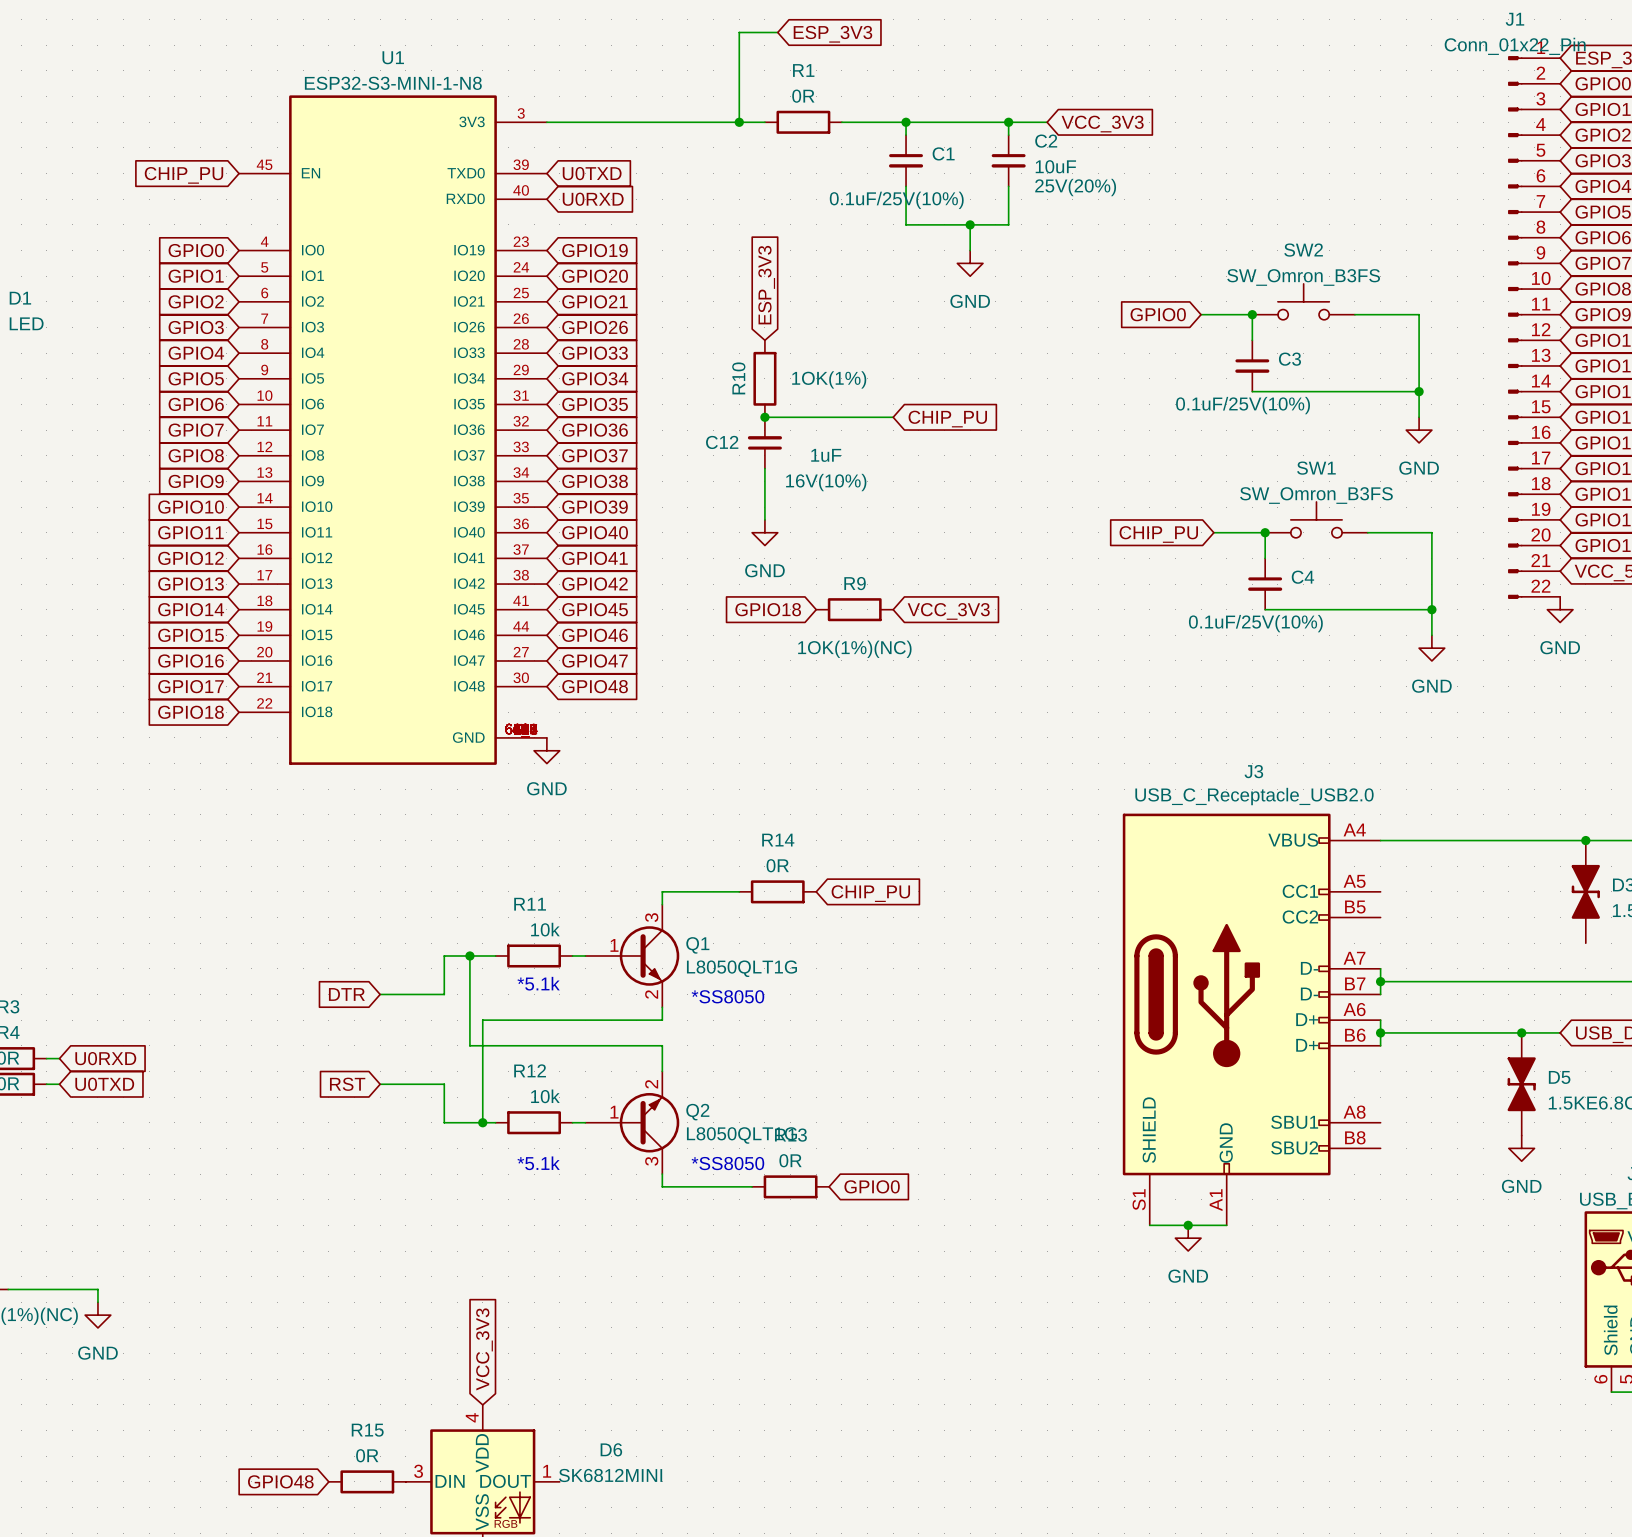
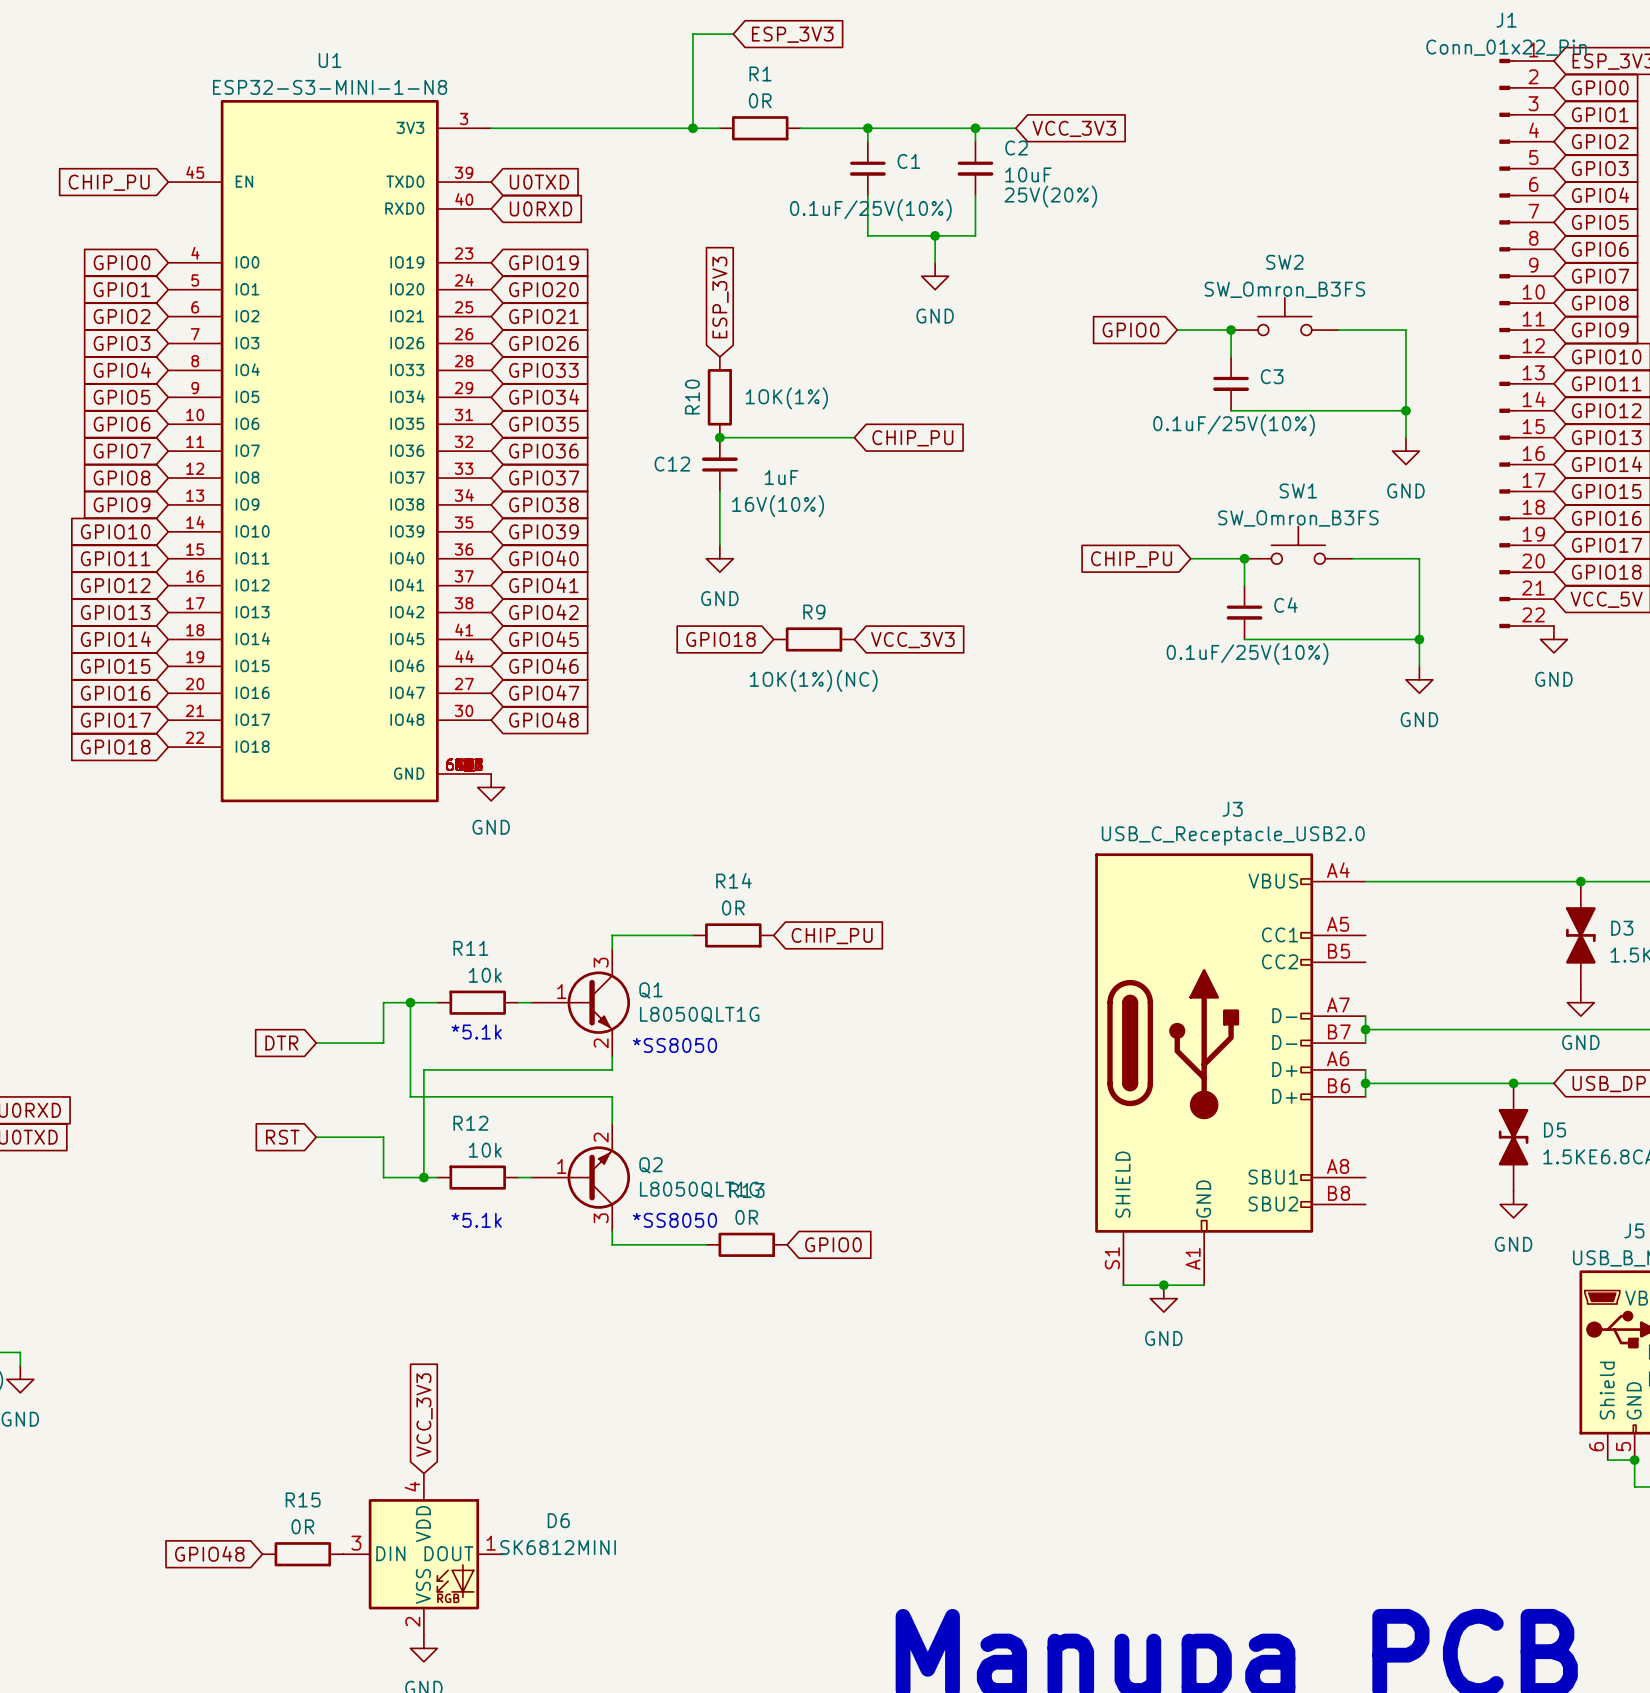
power symbol: none -> GND (1580, 1002)

